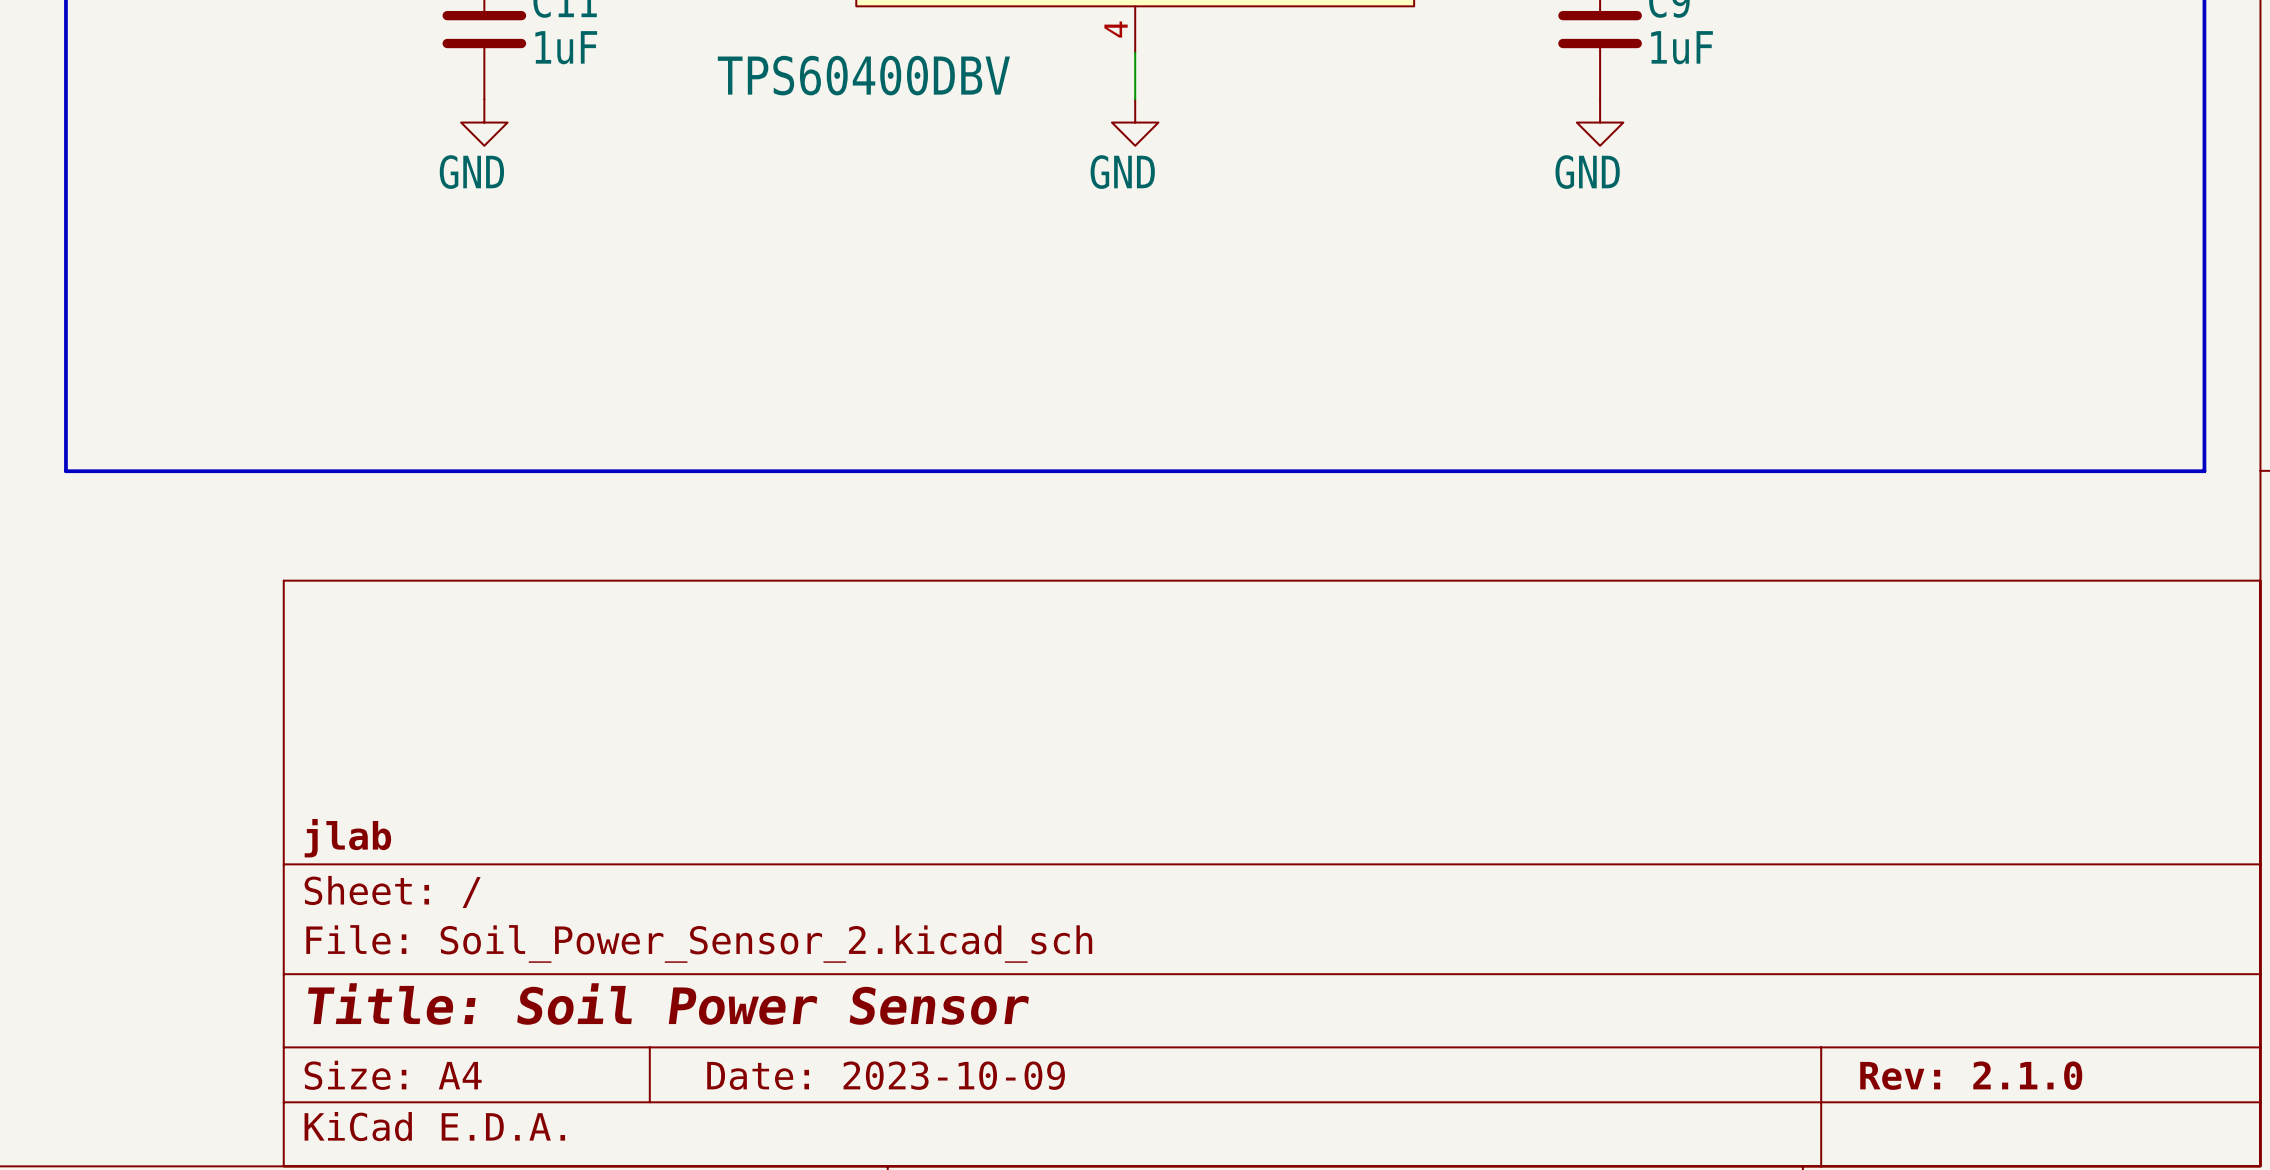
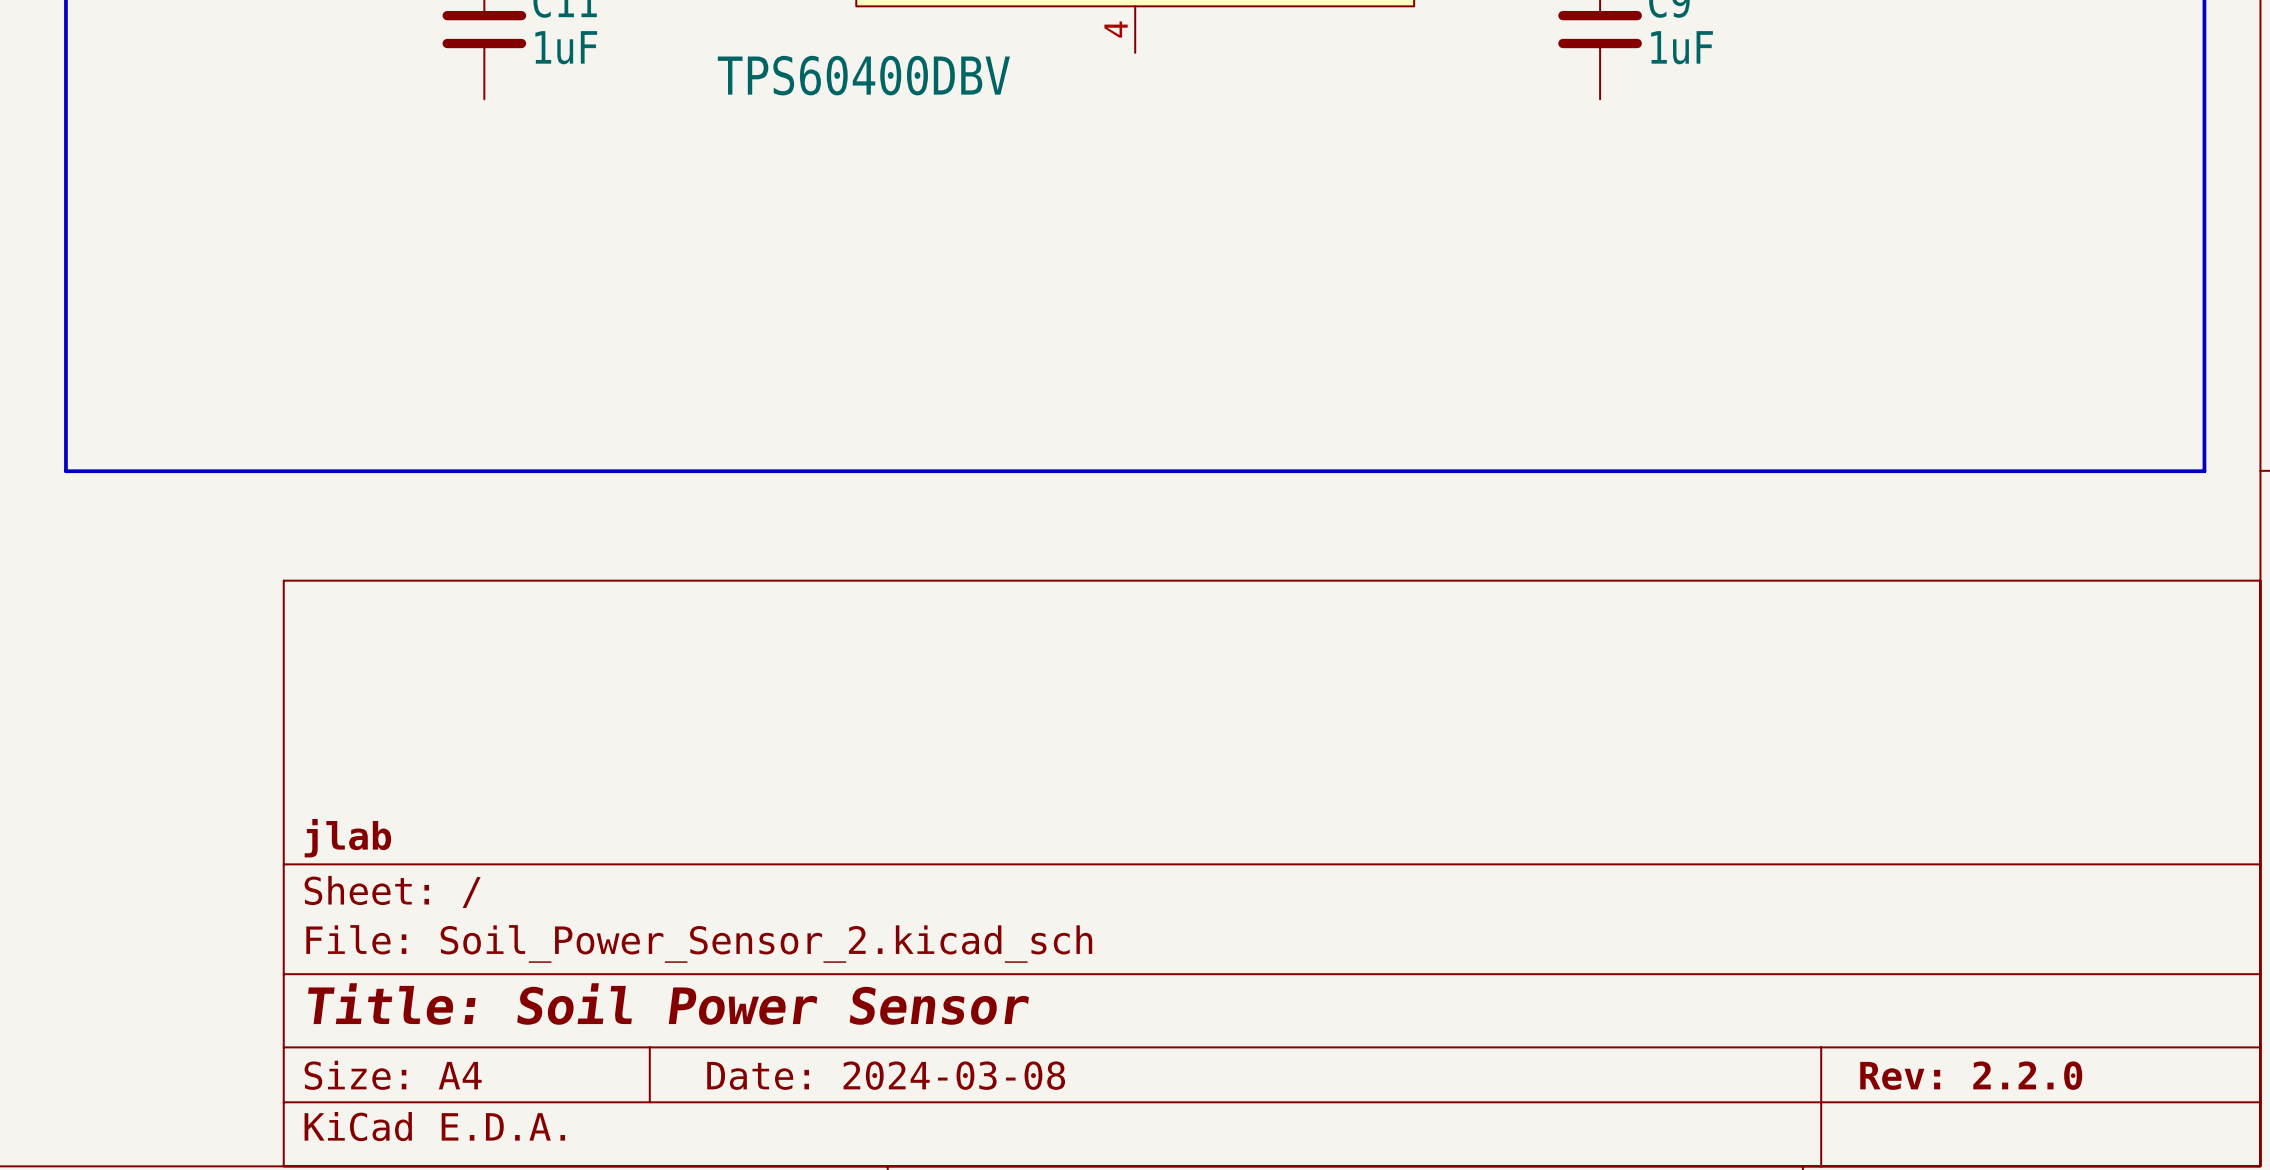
wire: (1135, 52) (1135, 99) -> none
power symbol: GND (484, 122) -> none
power symbol: GND (1135, 122) -> none
power symbol: GND (1600, 122) -> none
title block: Date: 2023-10-09 (886, 1075) -> Date: 2024-03-08 (886, 1075)
title block: Rev: 2.1.0 (1971, 1075) -> Rev: 2.2.0 (1971, 1075)

